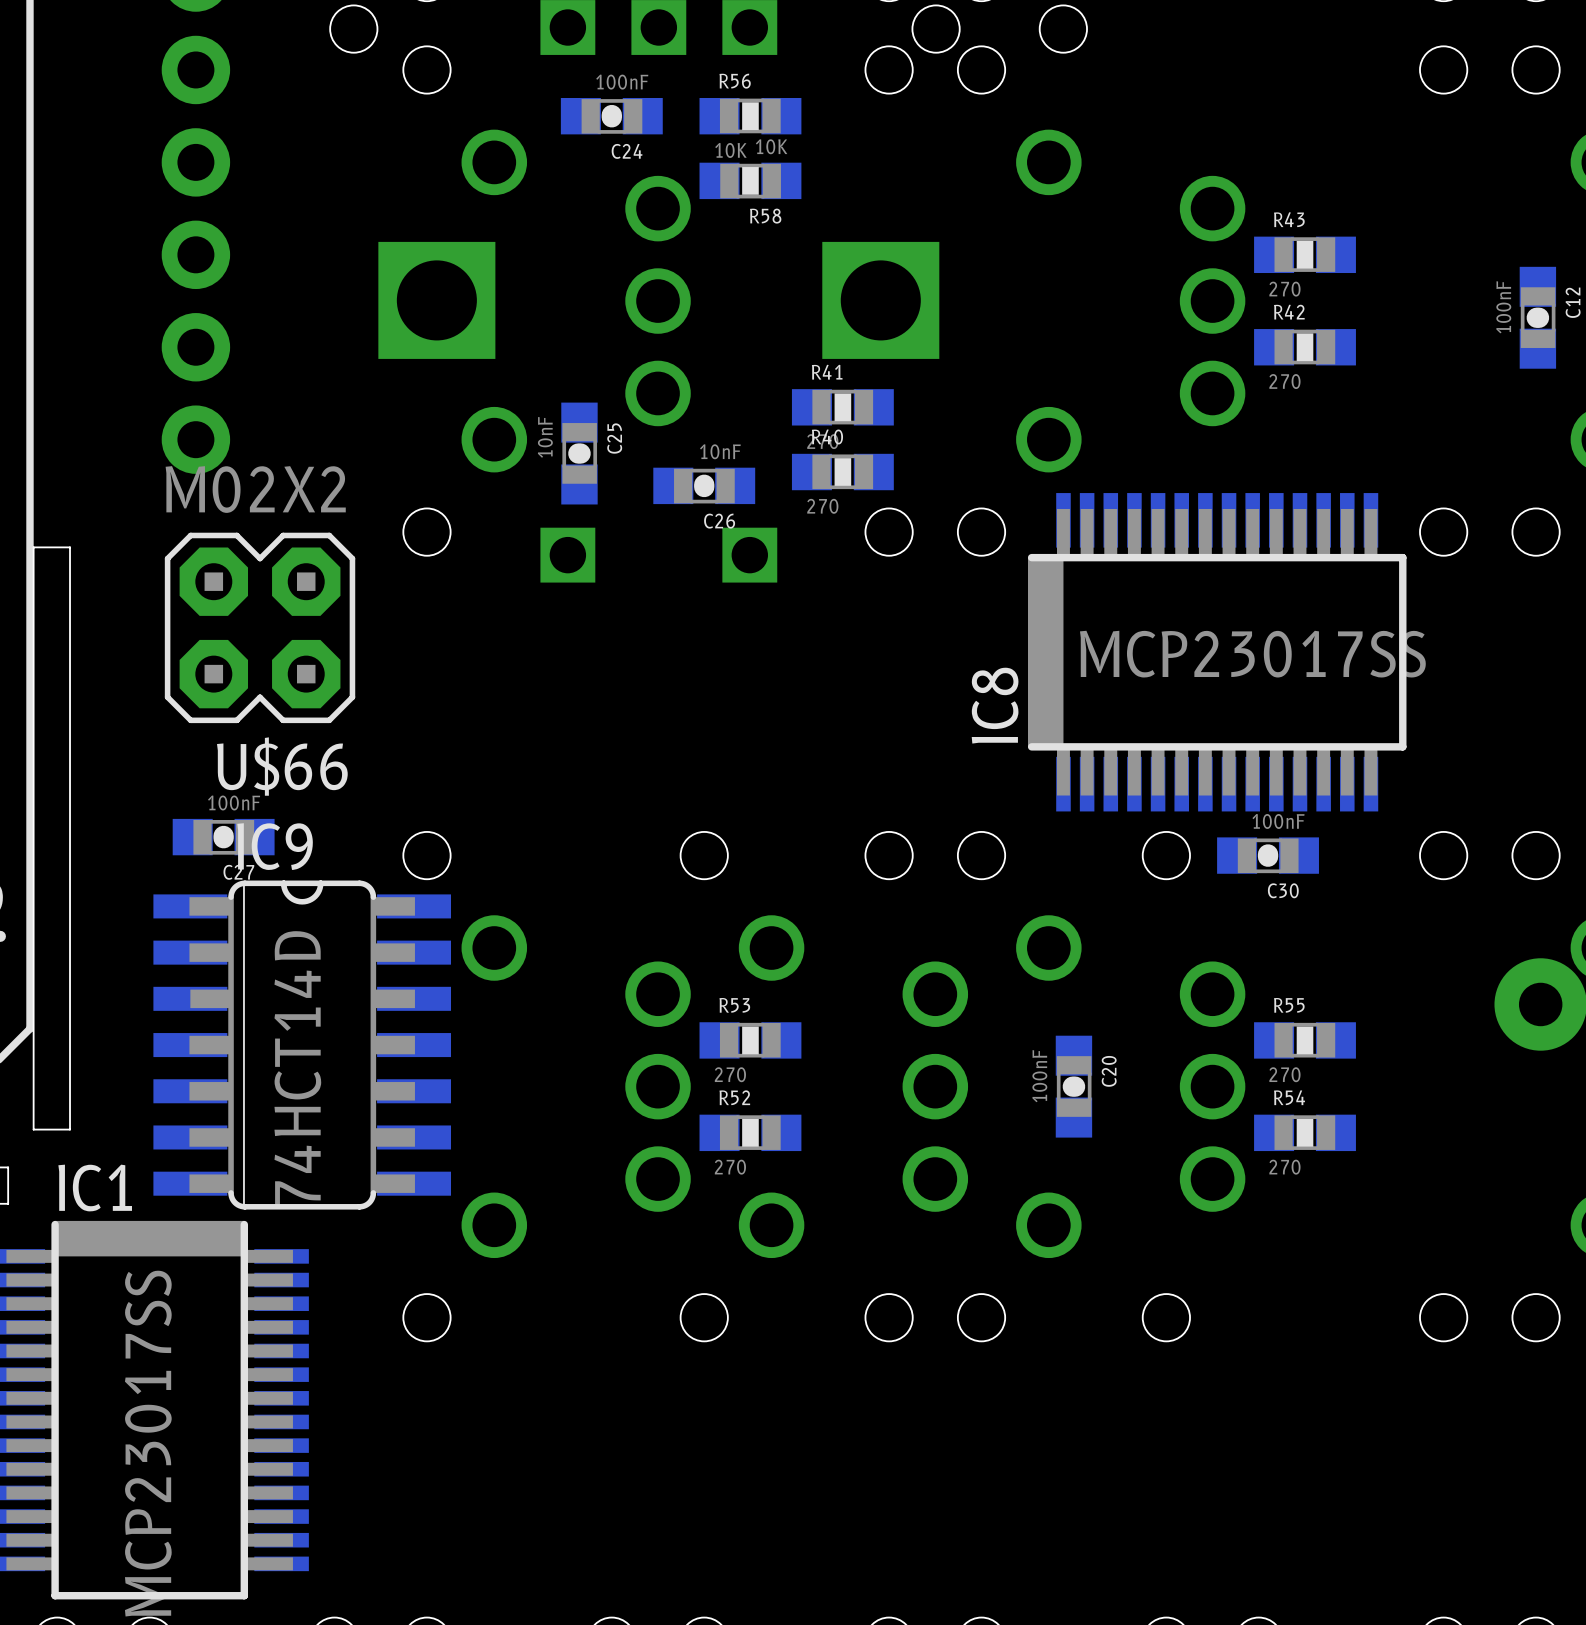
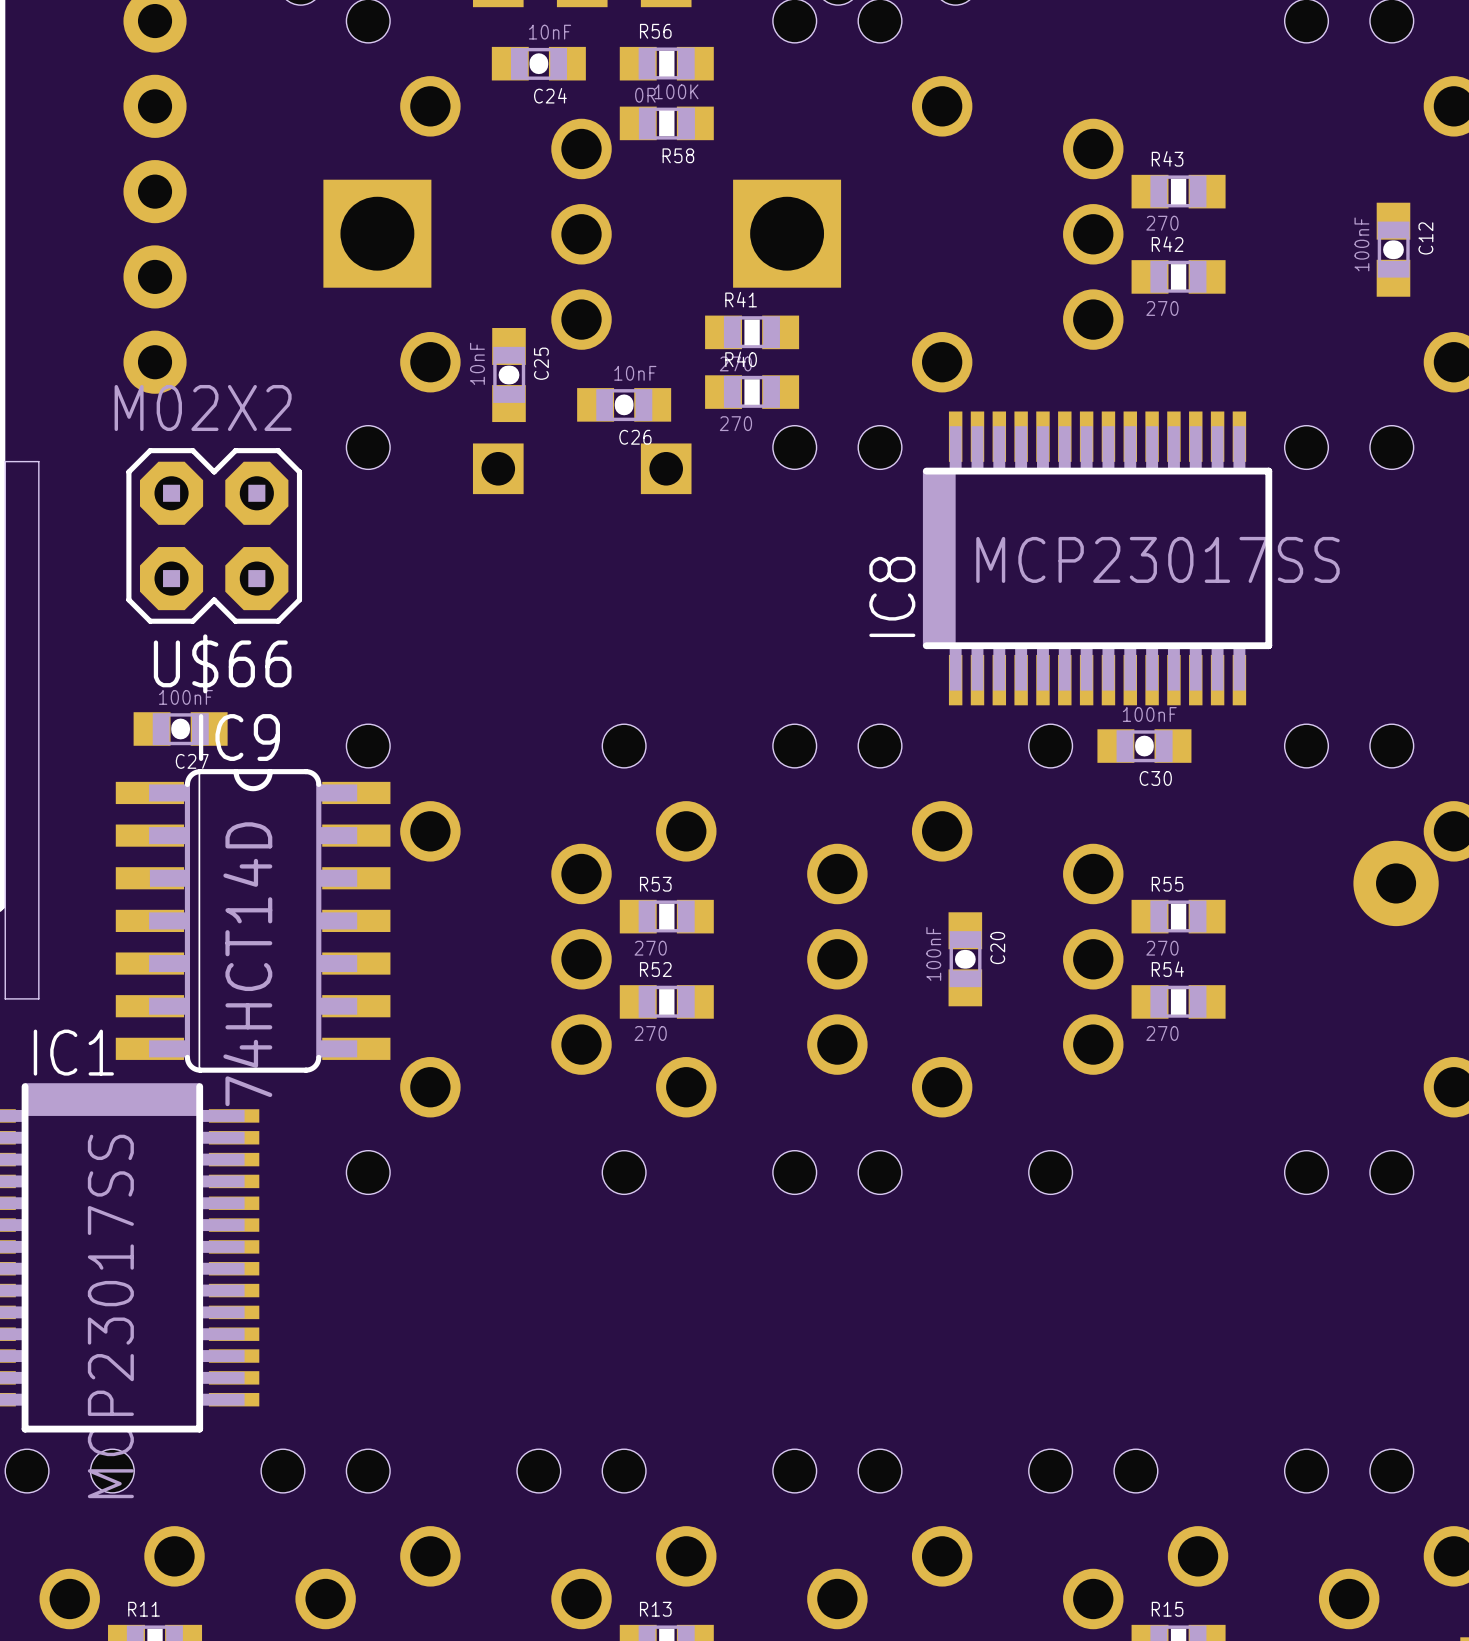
C24 value: 100nF (622, 82) -> 10nF (550, 32)
R58 value: 10K (771, 146) -> 100K (676, 91)
R56 value: 10K (730, 150) -> 0R (645, 95)

